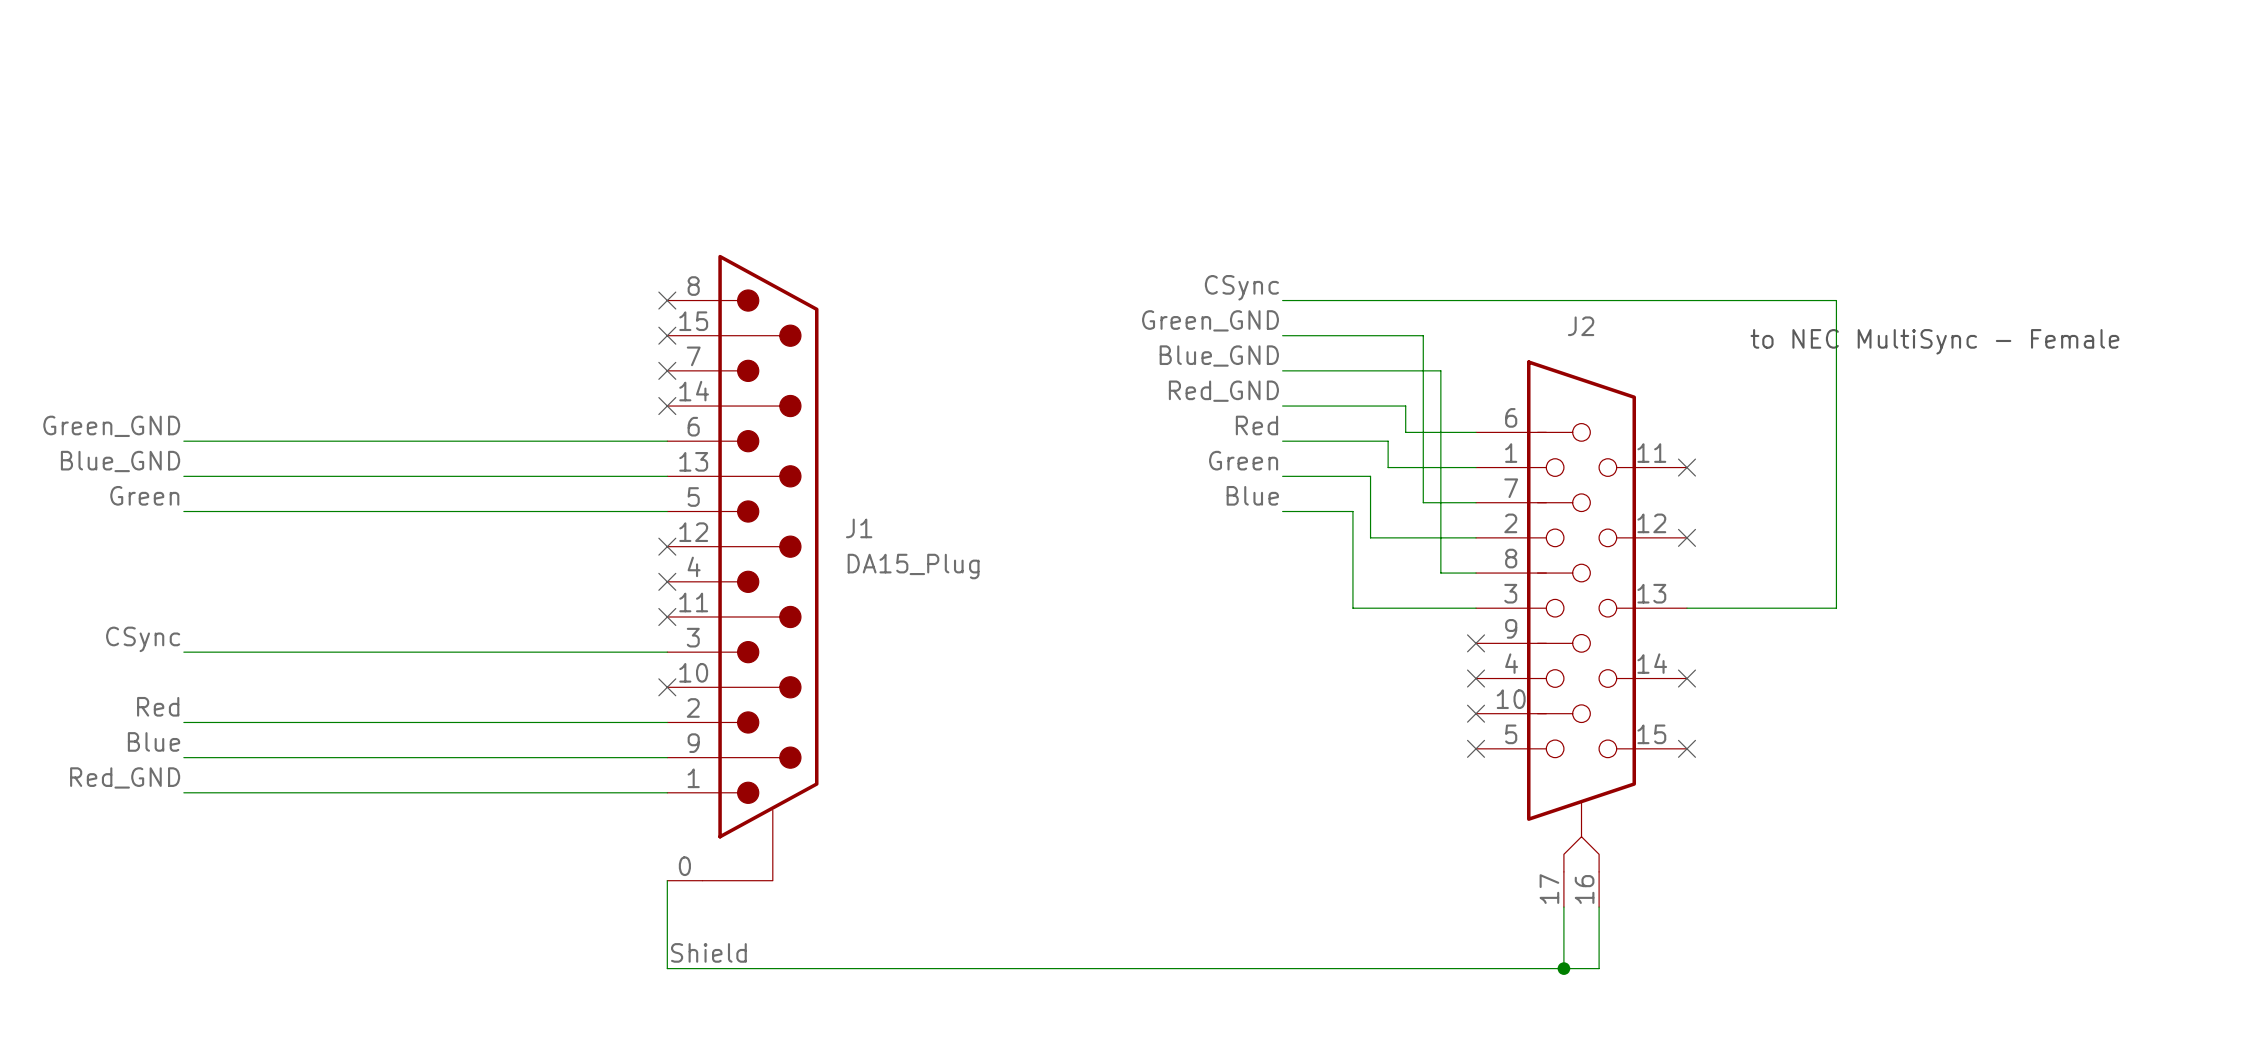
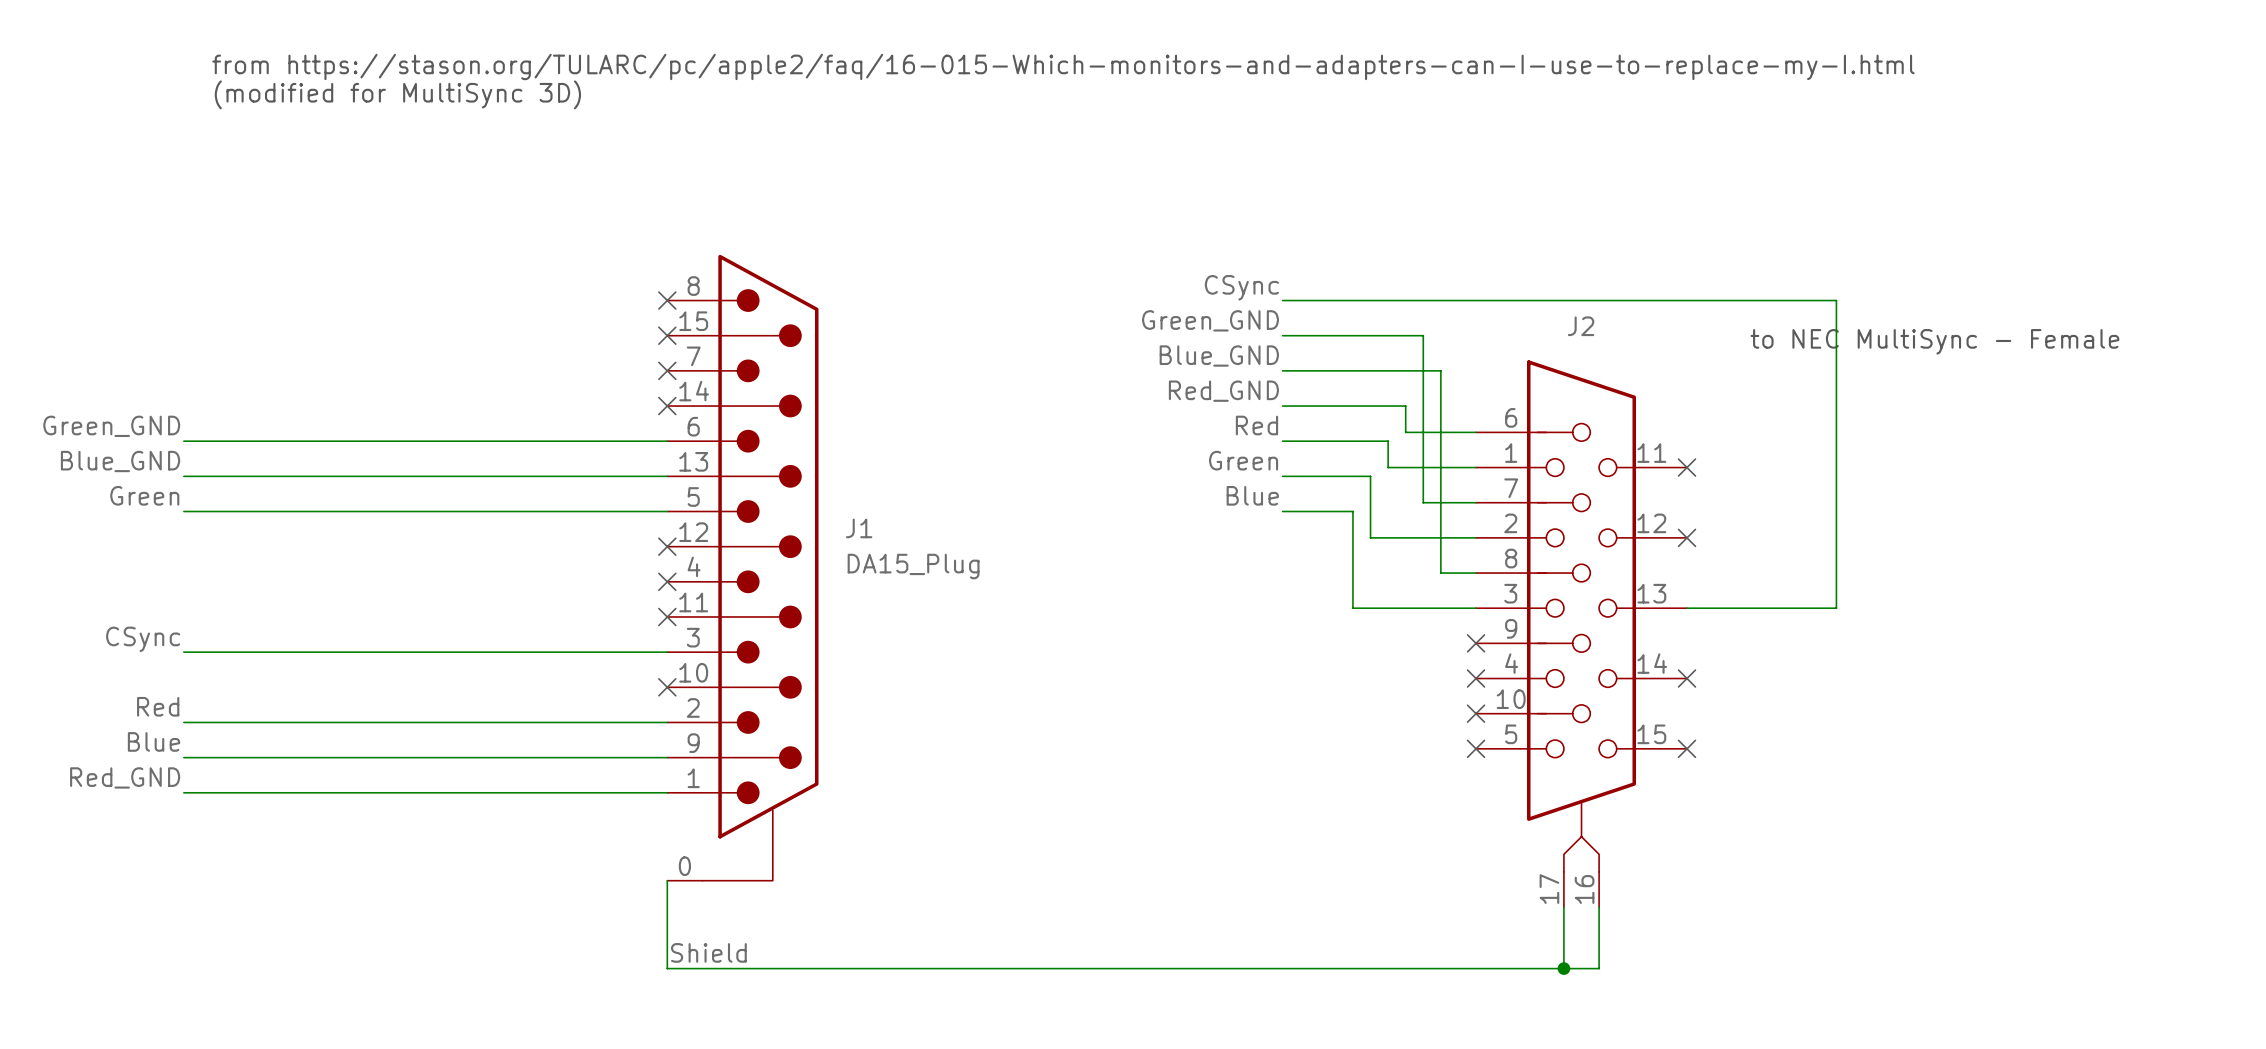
text: none -> from https://stason.org/TULARC/pc/apple2/faq/16-015-Which-monitors-and-adapters-can-I-use-to-replace-my-I.html (1063, 66)
text: none -> (modified for MultiSync 3D) (397, 94)

